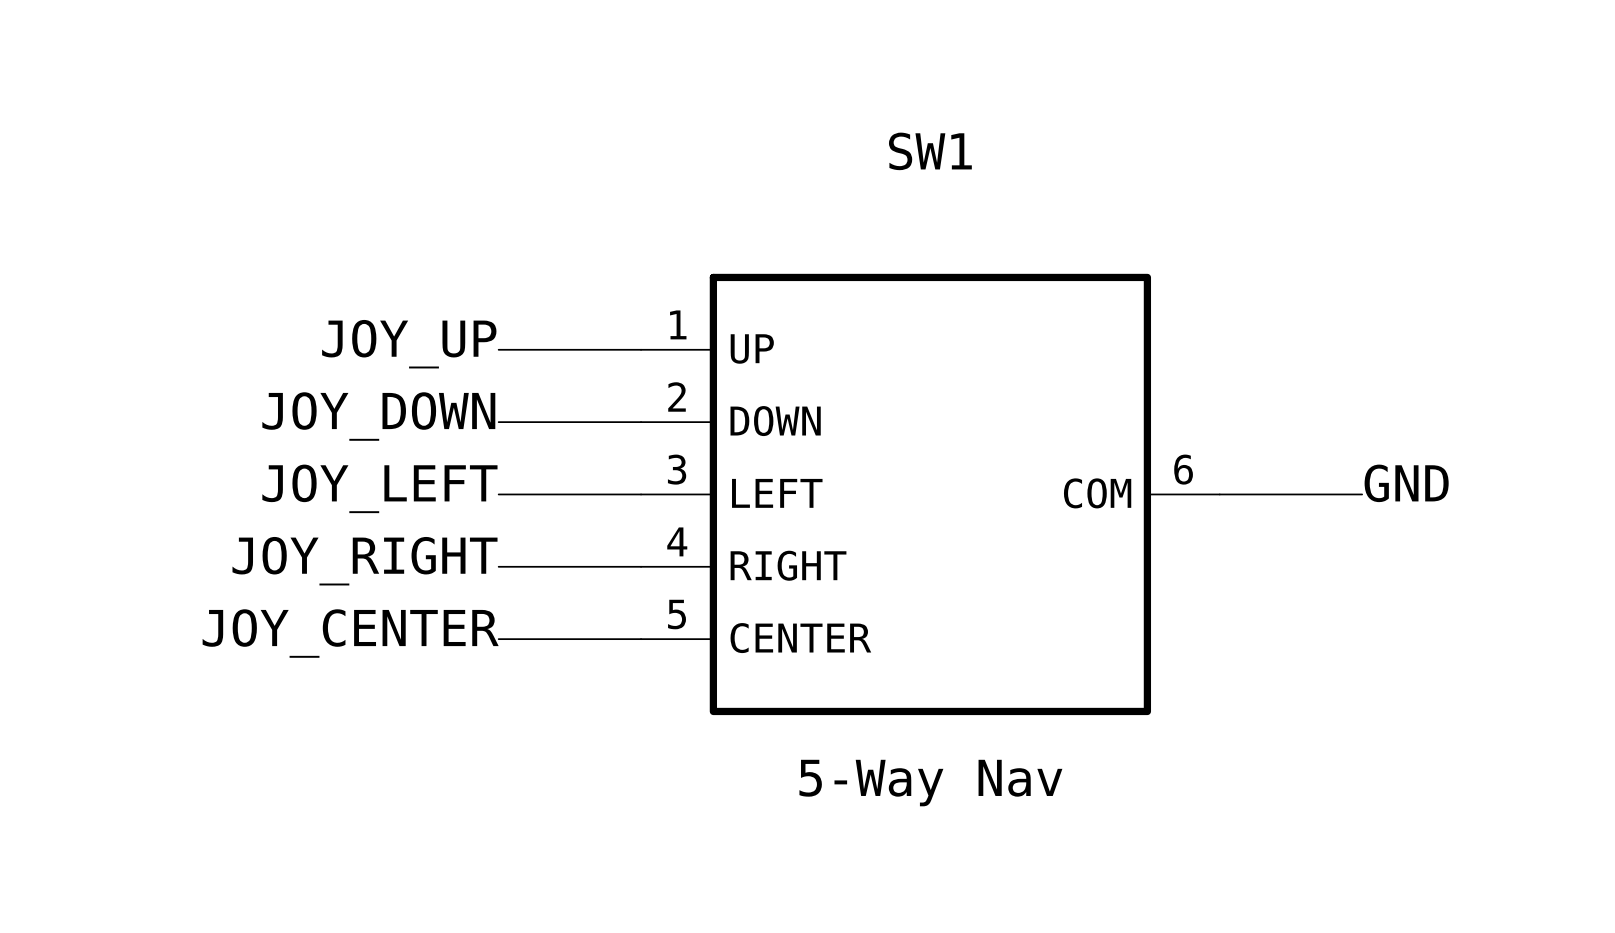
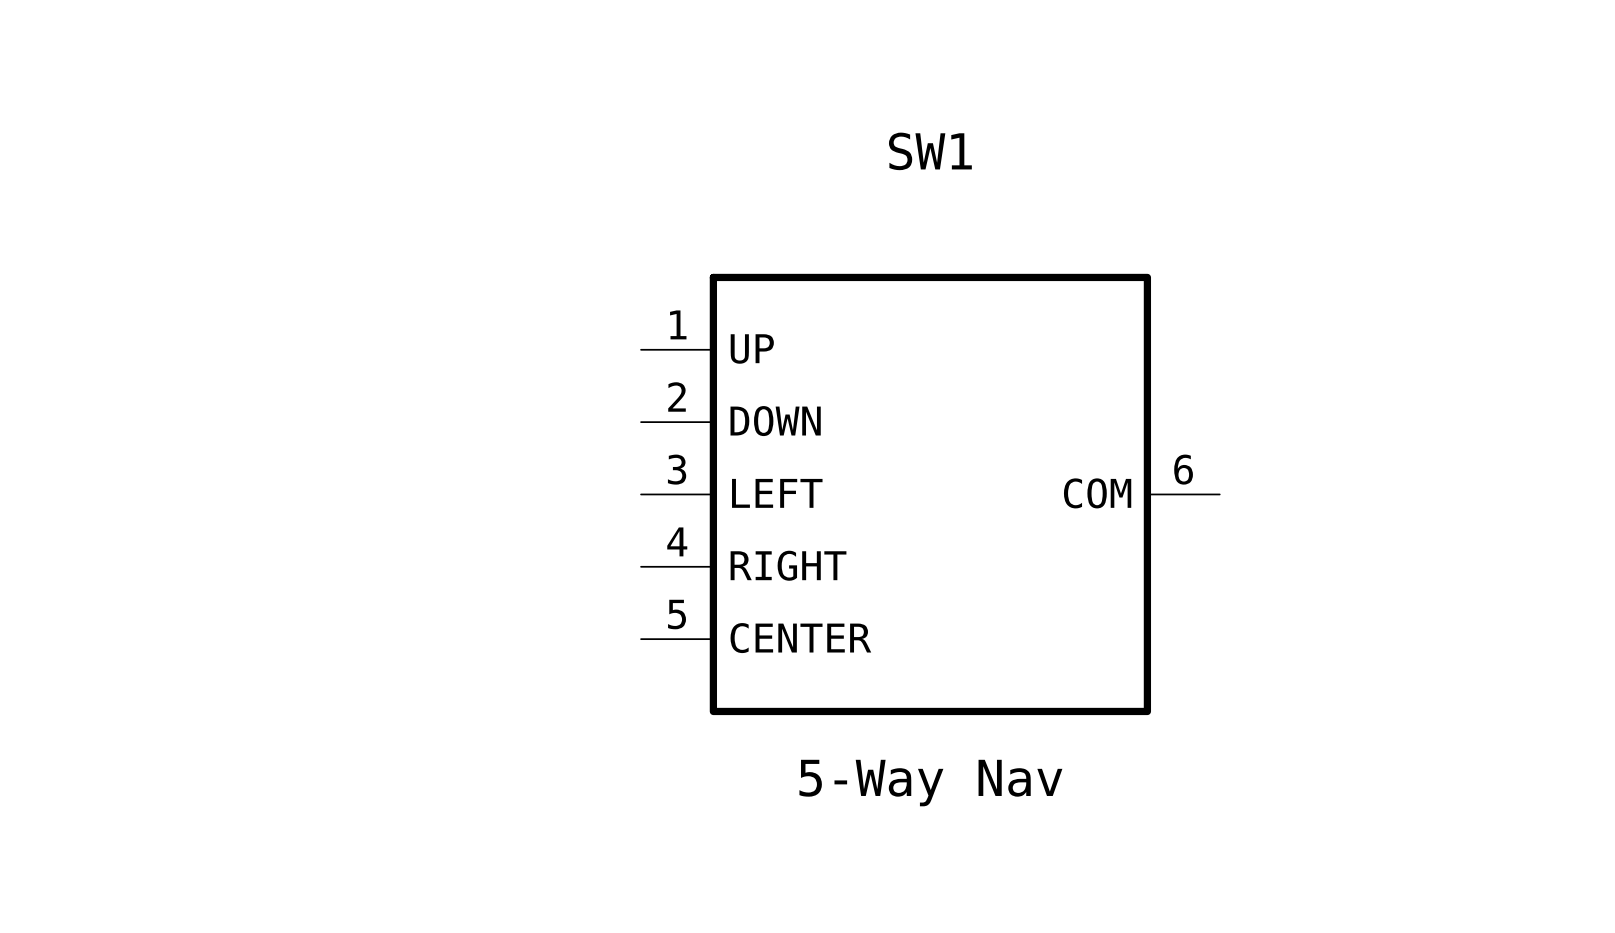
label: JOY_UP (409, 344) -> none
wire: (498, 349) (641, 349) -> none
label: JOY_DOWN (378, 416) -> none
wire: (498, 422) (641, 422) -> none
label: GND (1406, 483) -> none
label: JOY_LEFT (379, 488) -> none
wire: (498, 494) (641, 494) -> none
wire: (1219, 494) (1362, 494) -> none
label: JOY_RIGHT (365, 561) -> none
wire: (498, 566) (641, 566) -> none
label: JOY_CENTER (350, 633) -> none
wire: (498, 639) (641, 639) -> none

